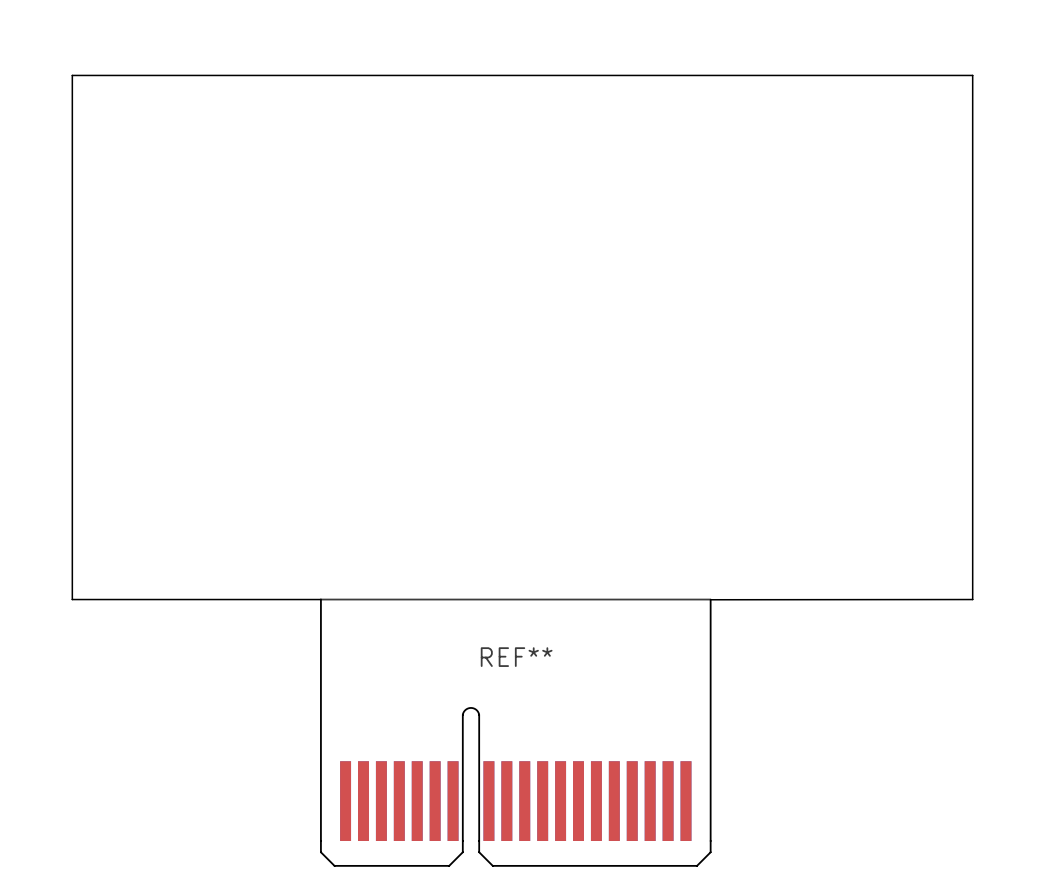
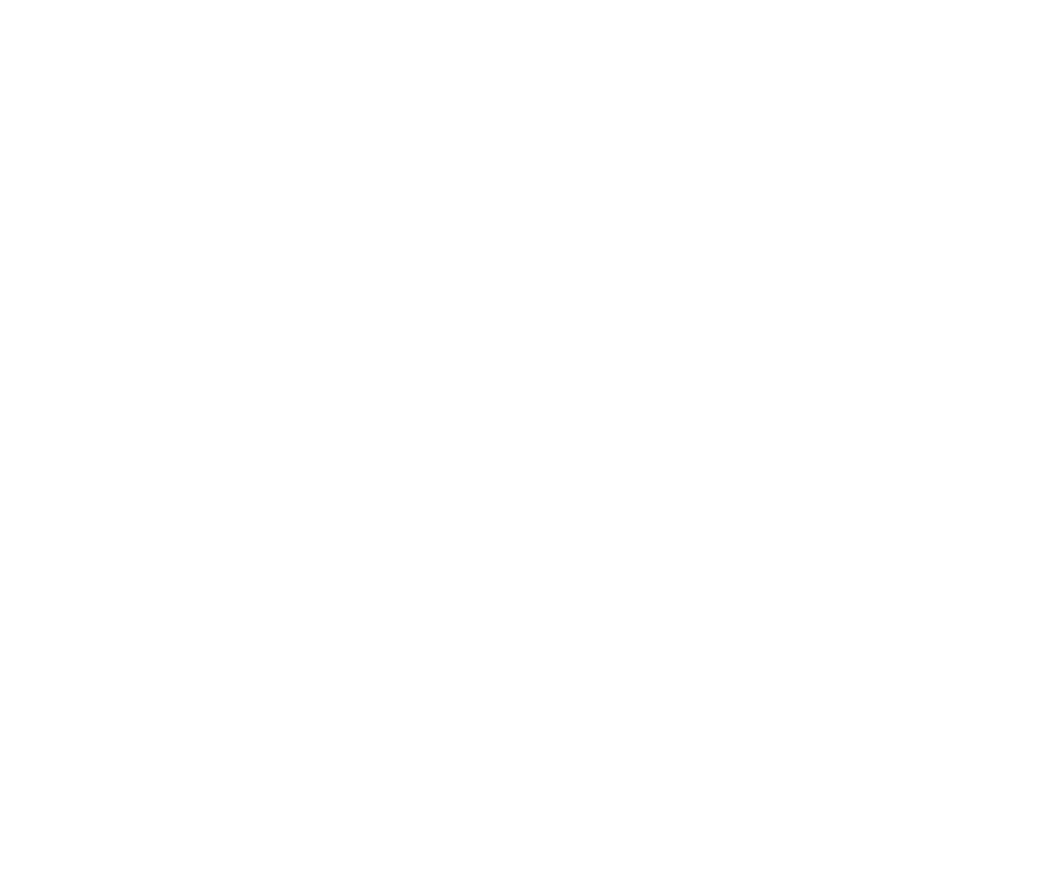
board edge: (320, 599) (72, 599) (72, 75) (972, 75) (972, 599) (710, 599) -> none
REF**: (515, 732) -> none

